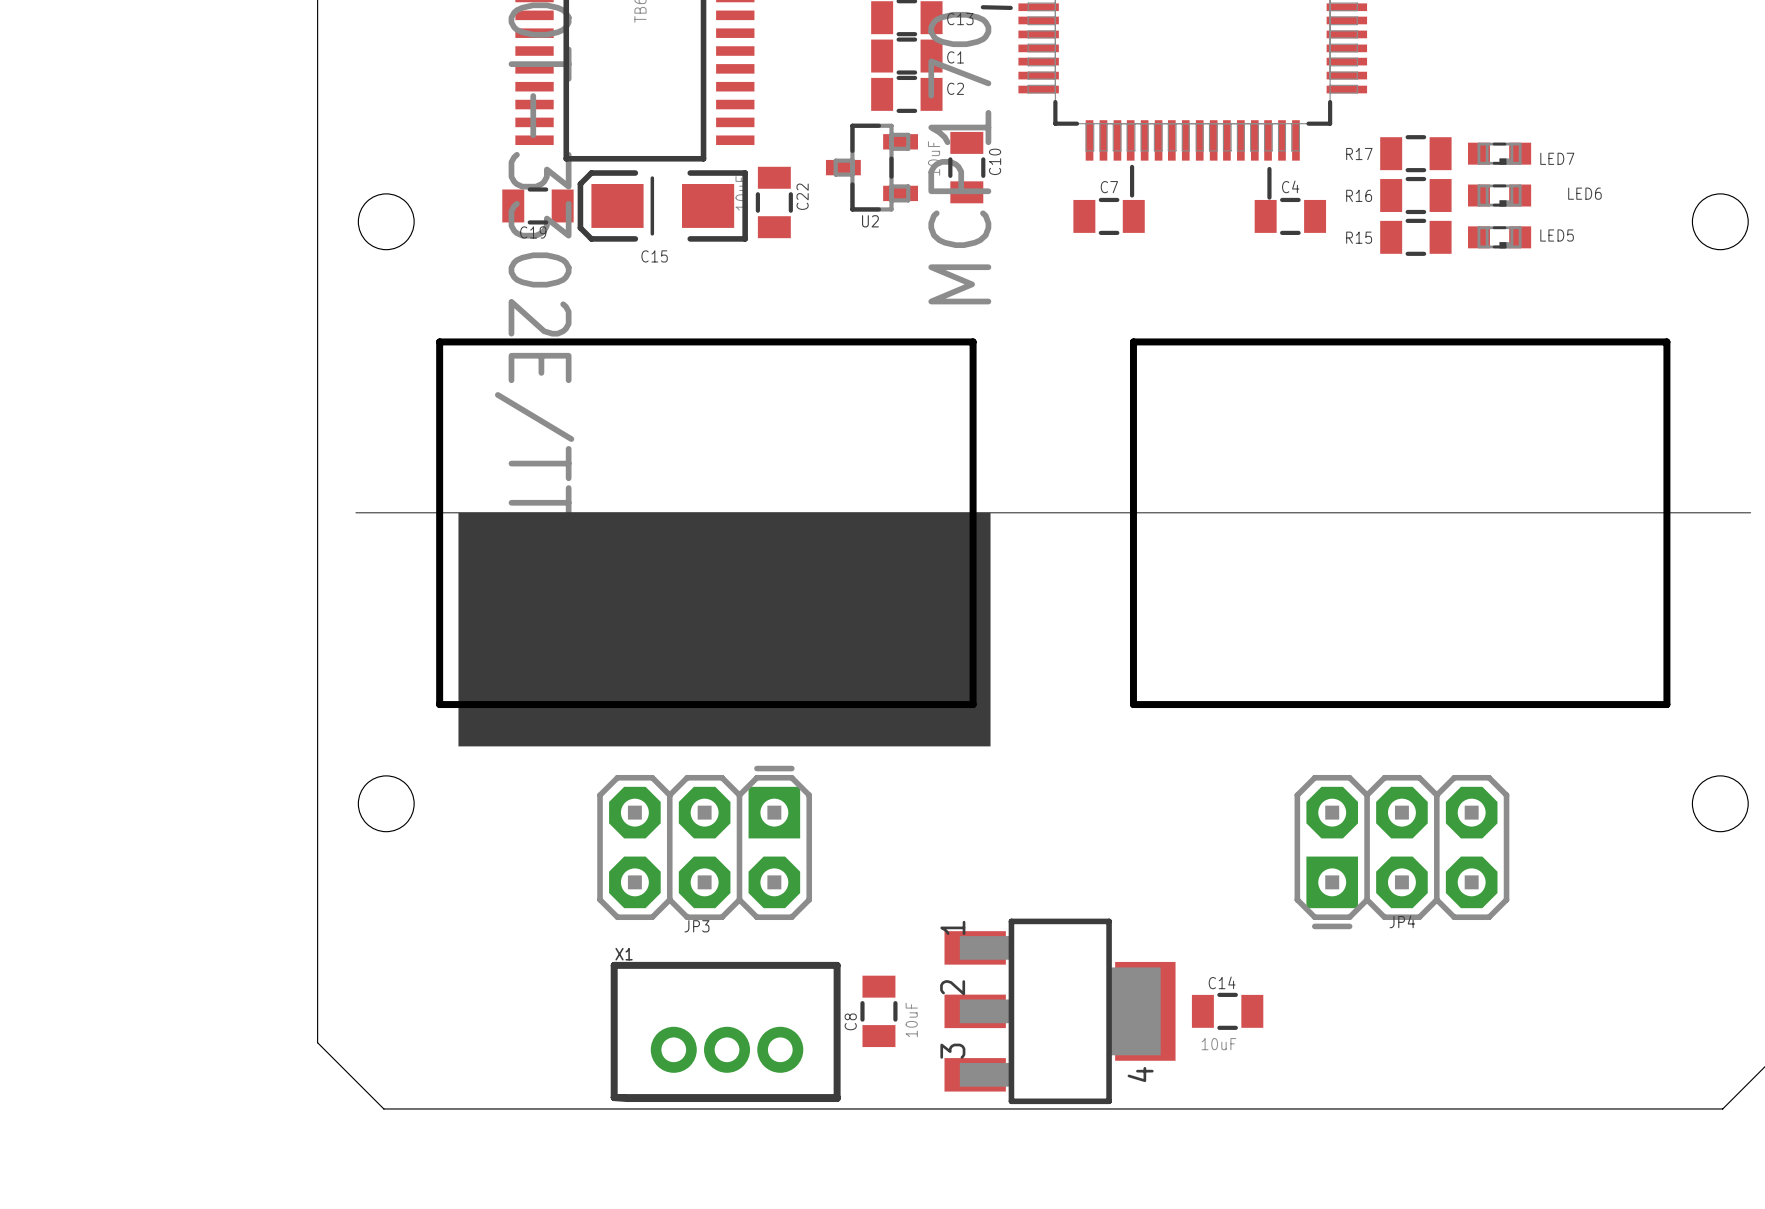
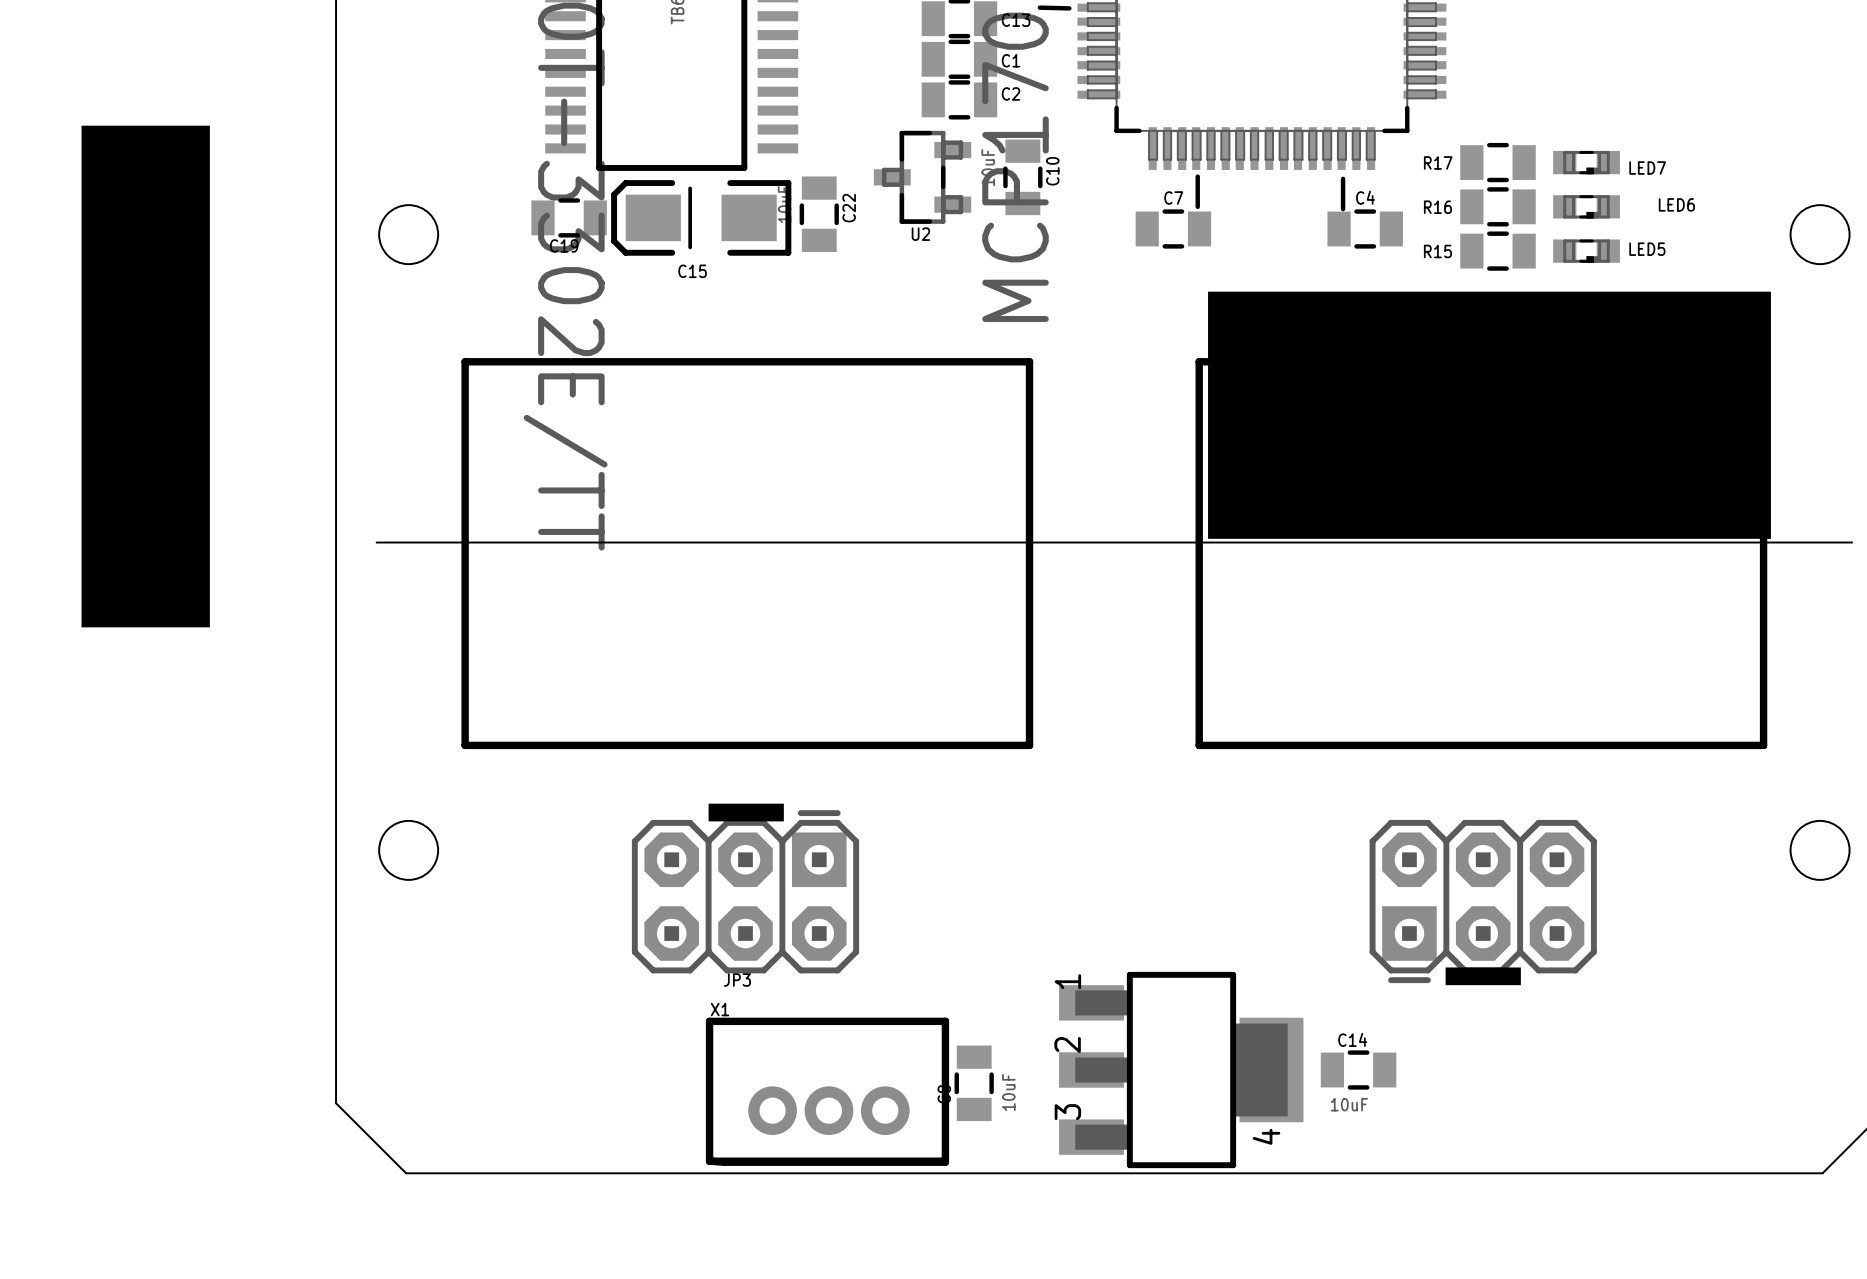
drawing: none -> [81, 125, 210, 628]
drawing: none -> [1208, 291, 1771, 539]
drawing: [458, 512, 991, 747] -> none
drawing: none -> [708, 803, 784, 822]
drawing: none -> [1445, 967, 1521, 986]
C8 position: (878, 1011) -> (974, 1083)
part position: (1060, 1011) -> (1181, 1070)
C14 position: (1227, 1011) -> (1358, 1070)
X1 position: (725, 1031) -> (827, 1091)

